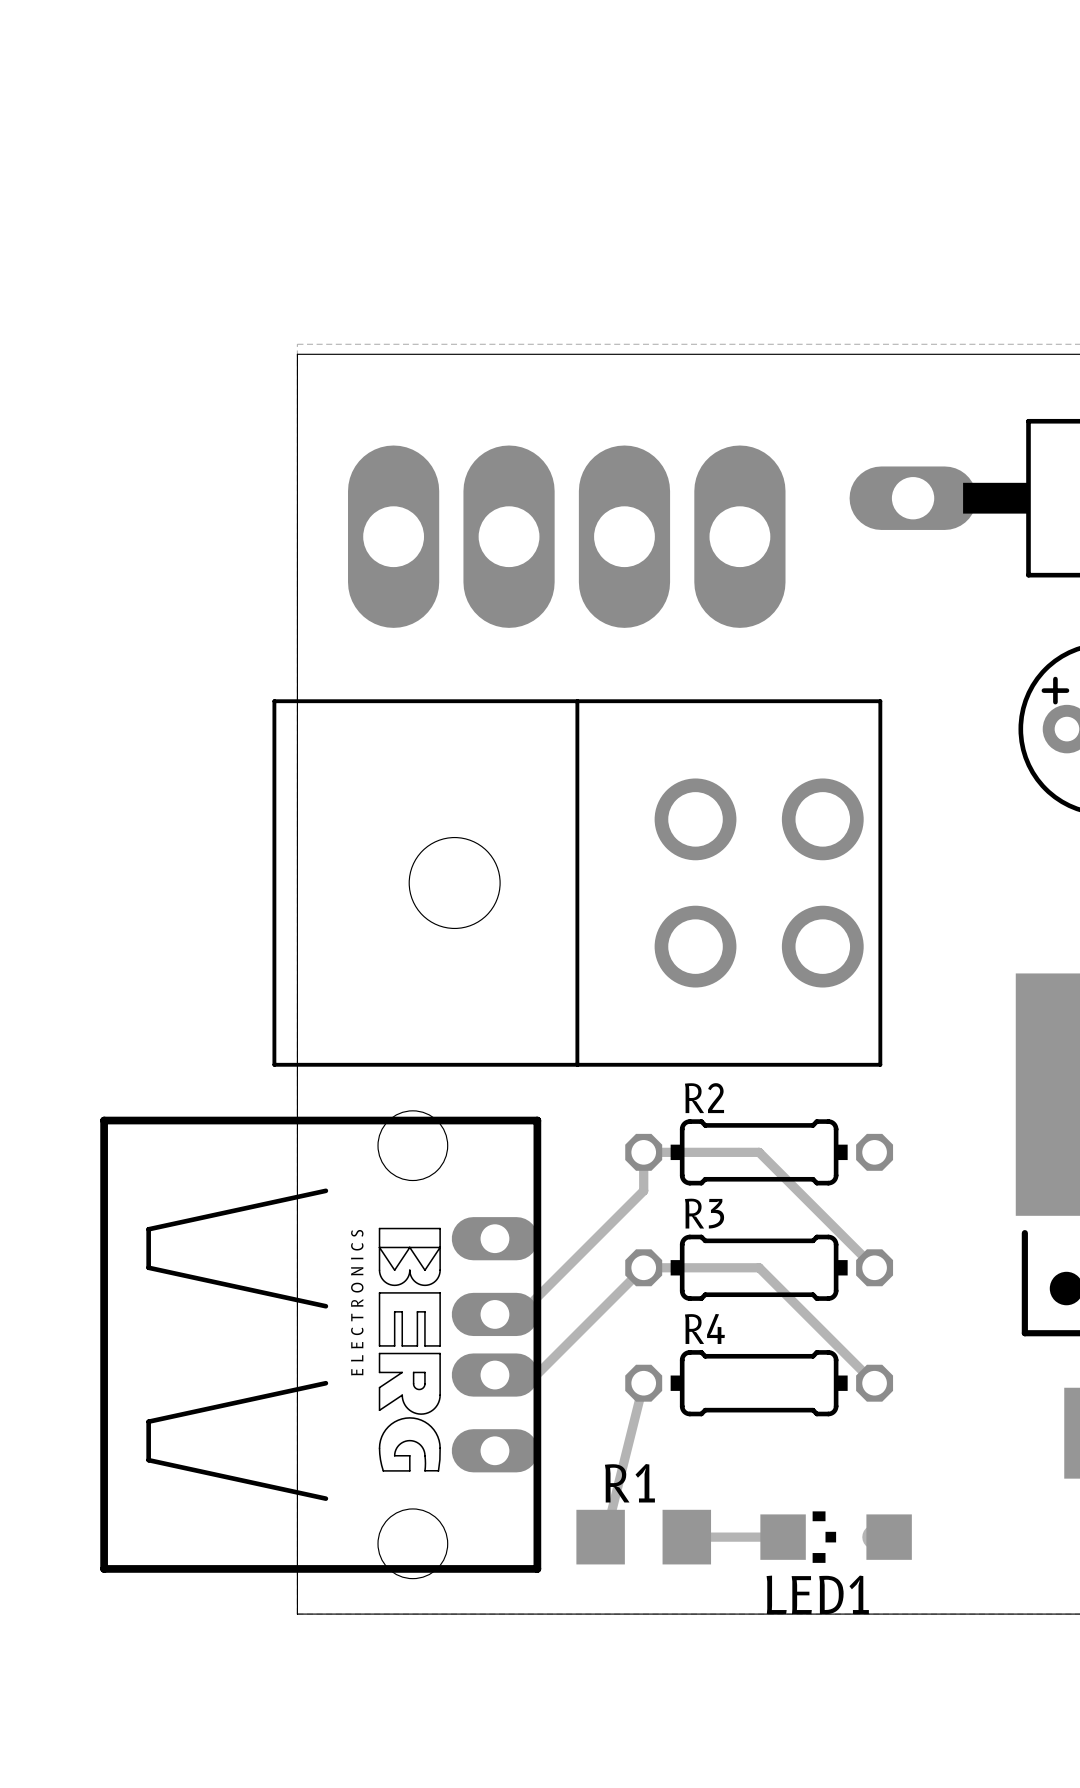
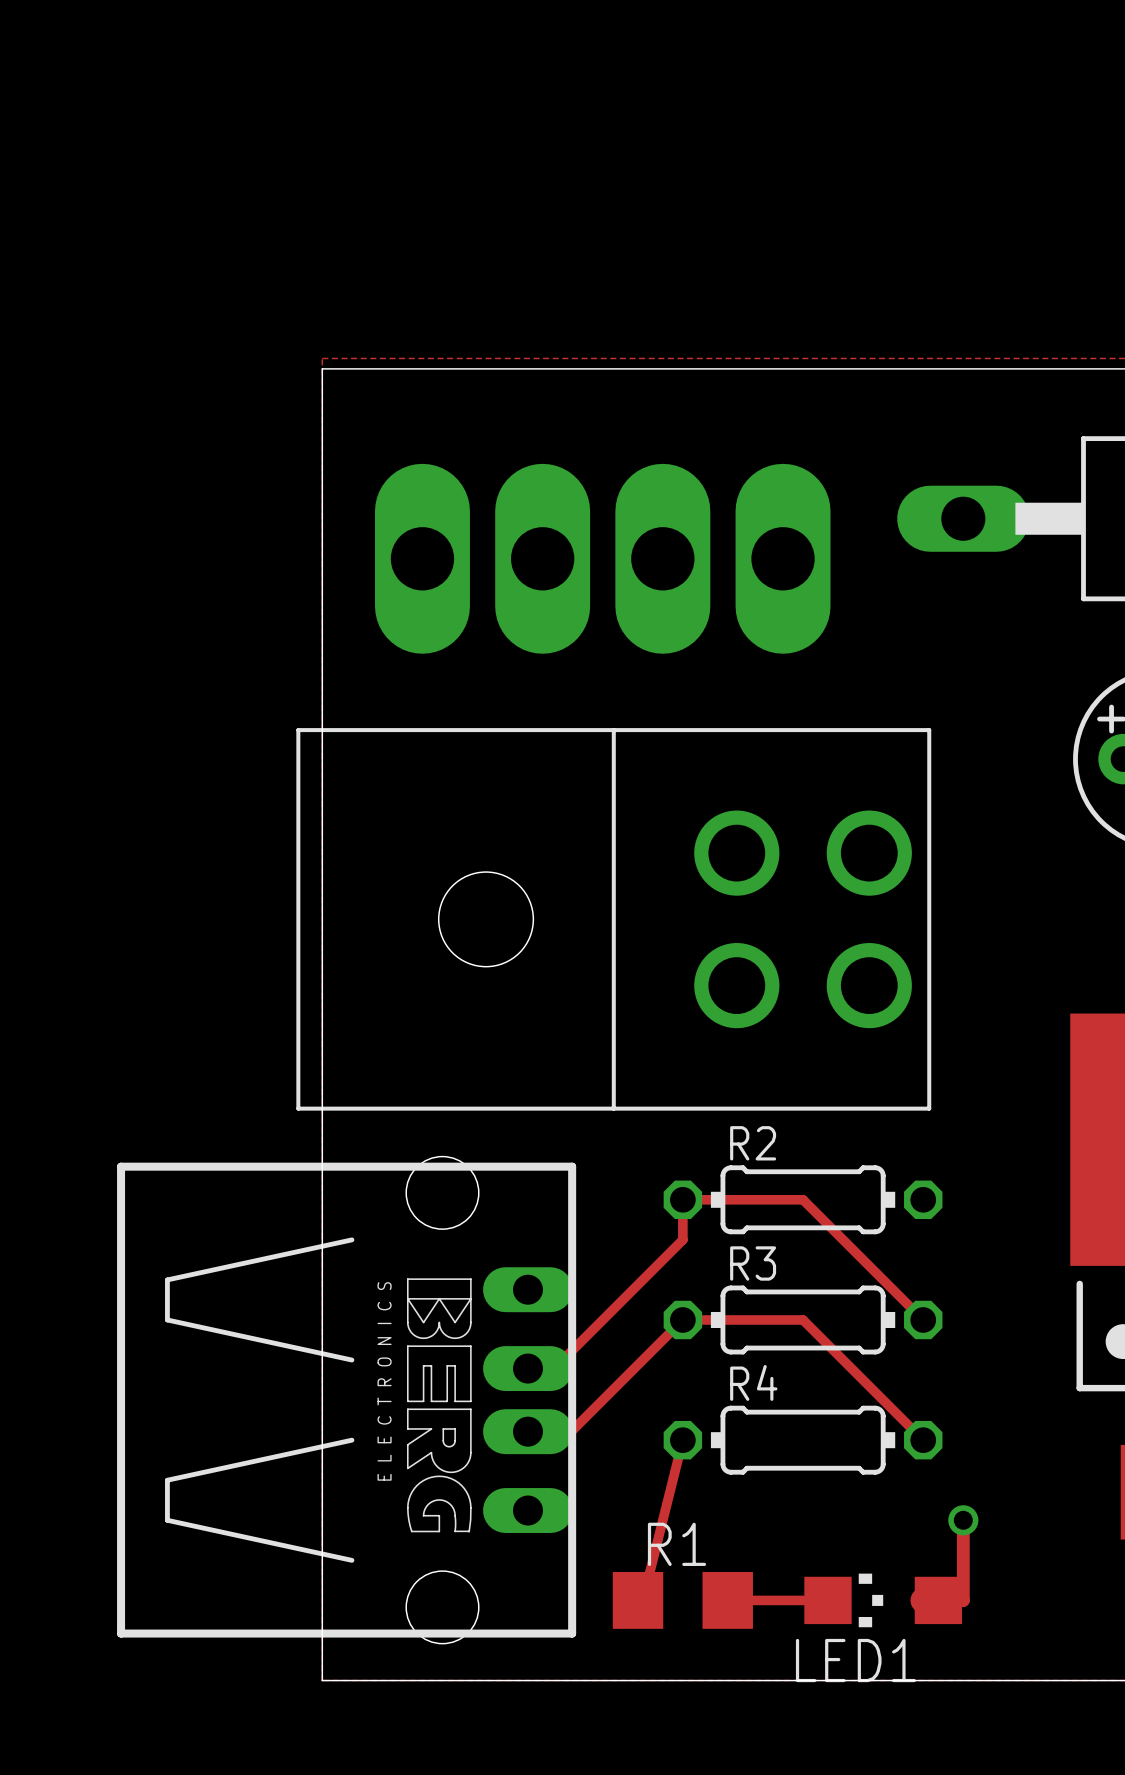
track: none -> (963, 1520) (963, 1600) (938, 1600)
via: none -> (963, 1520)

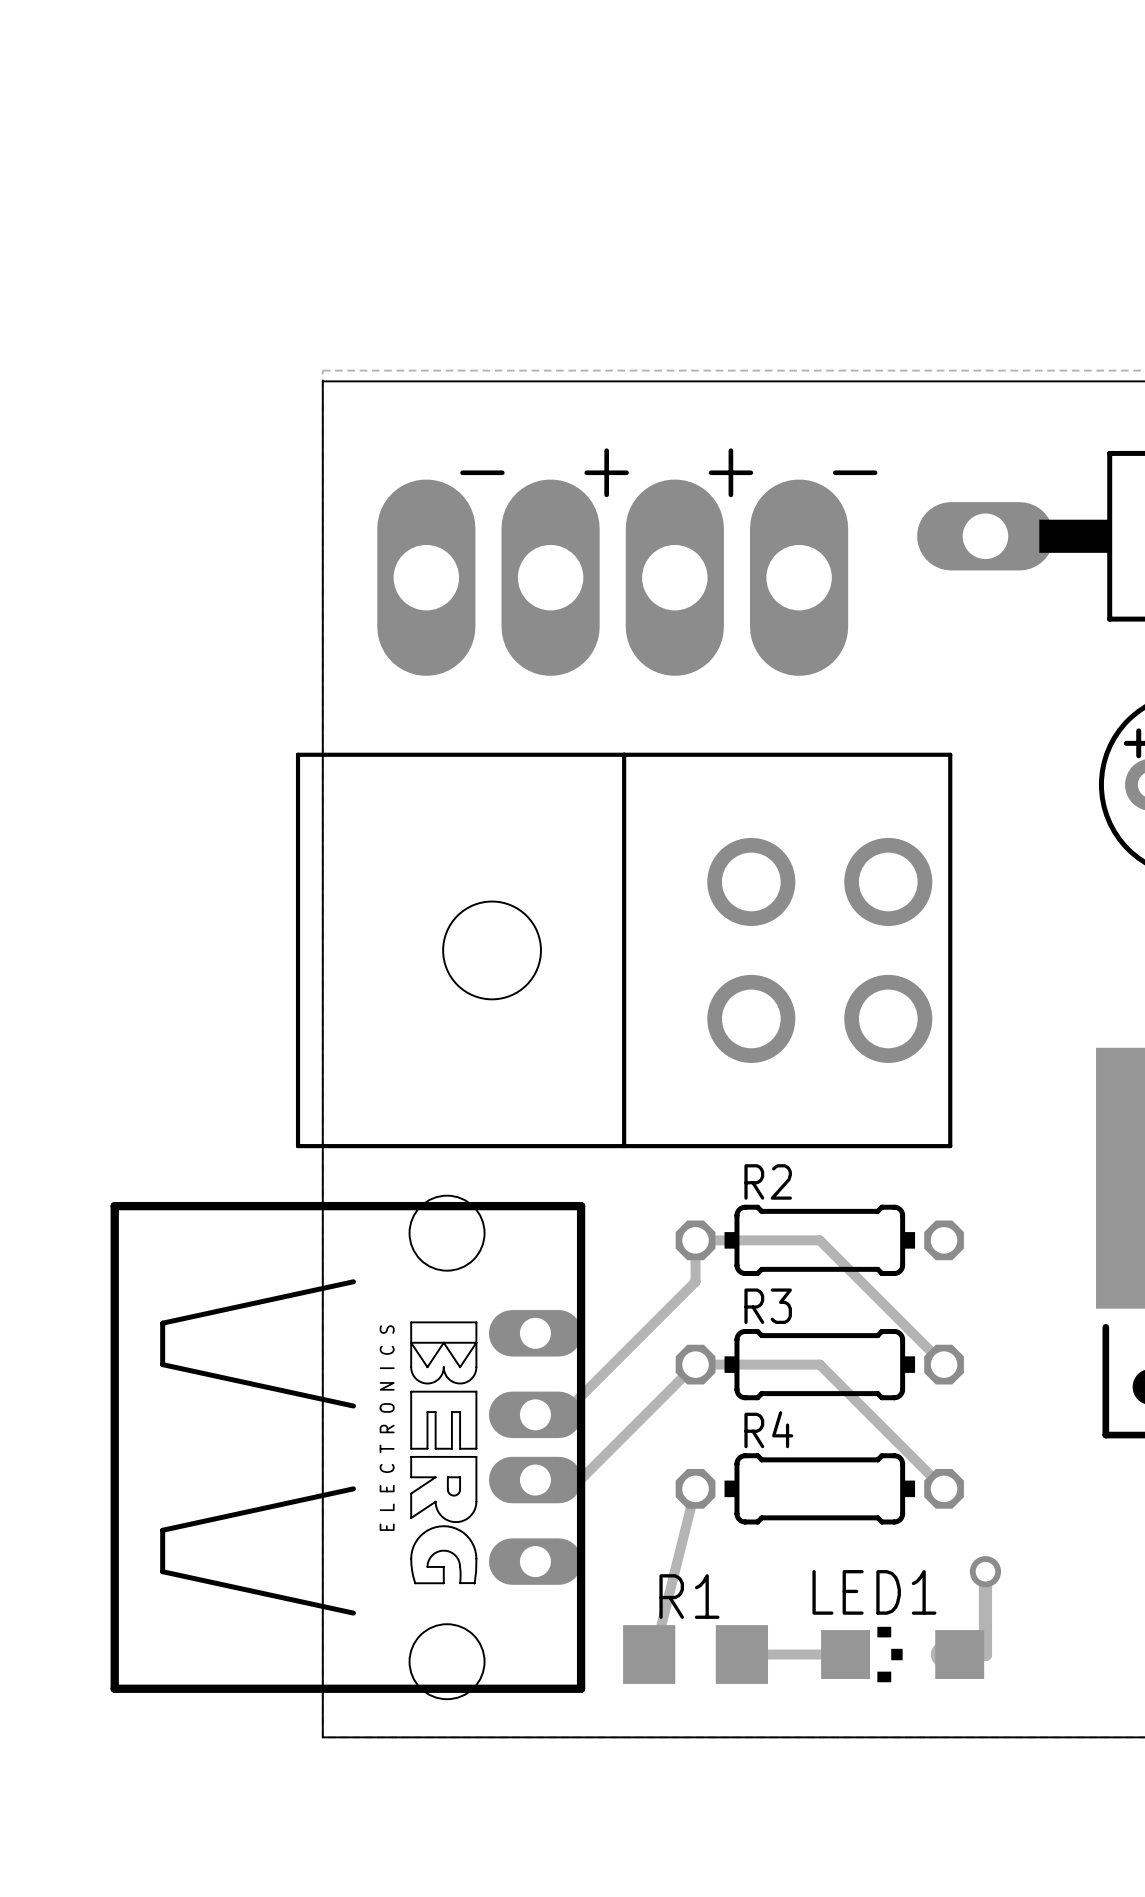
text: none -> - (482, 472)
text: none -> + (606, 472)
text: none -> + (730, 472)
text: none -> - (855, 472)
LED1 name position: LED1 (855, 1660) -> LED1 (874, 1592)

